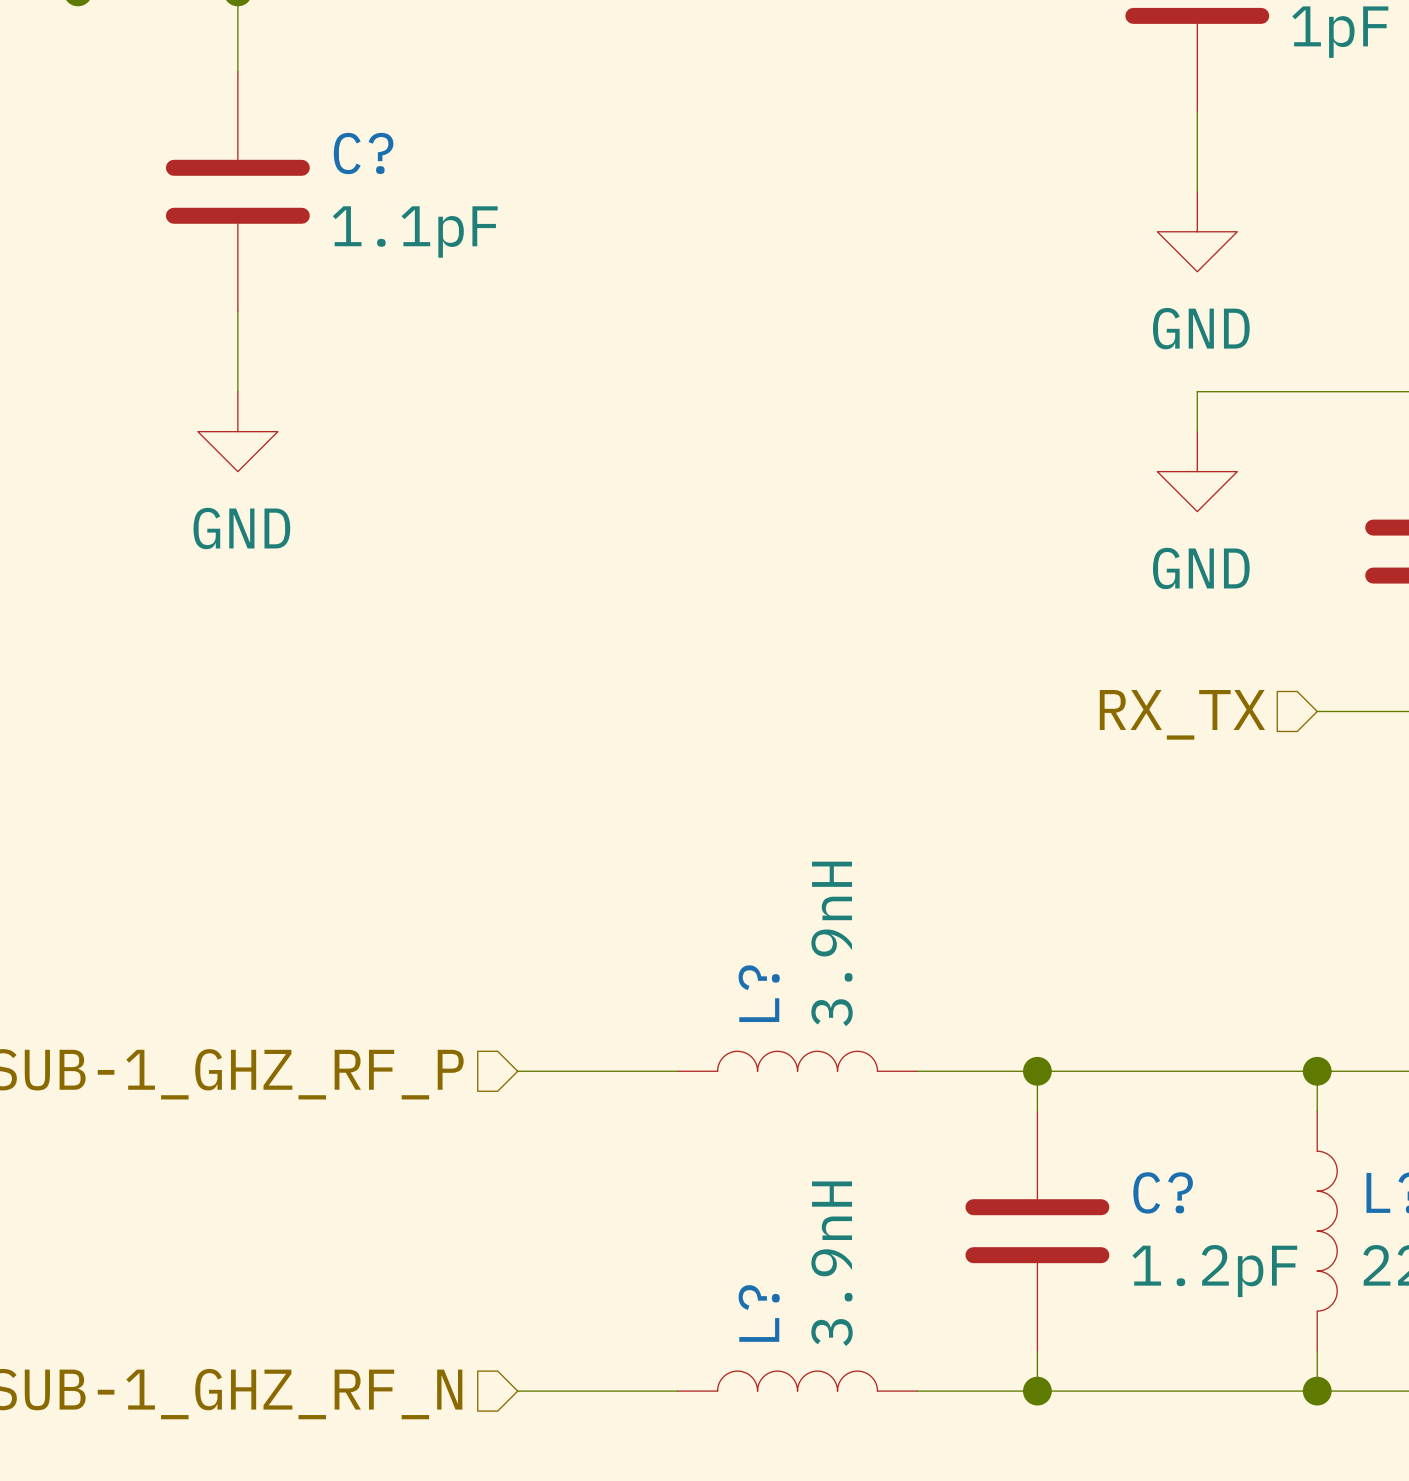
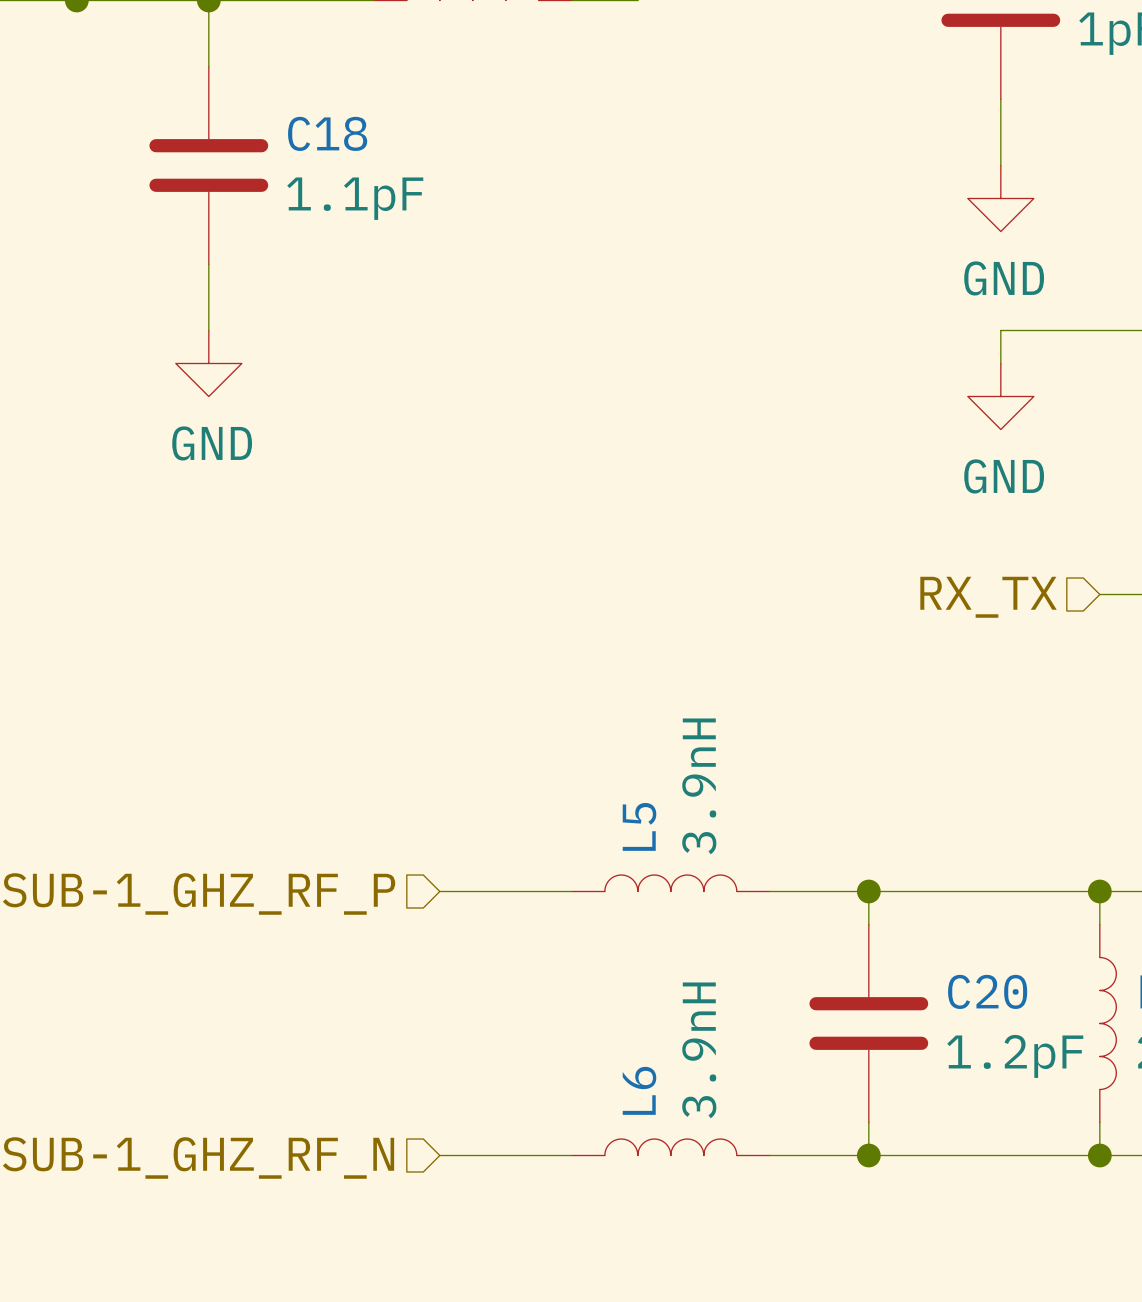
C? name: C? (363, 153) -> C18 (327, 133)
L? name: L? (759, 993) -> L5 (639, 826)
C? name: C? (1163, 1192) -> C20 (987, 991)
L? name: L? (759, 1313) -> L6 (639, 1090)

